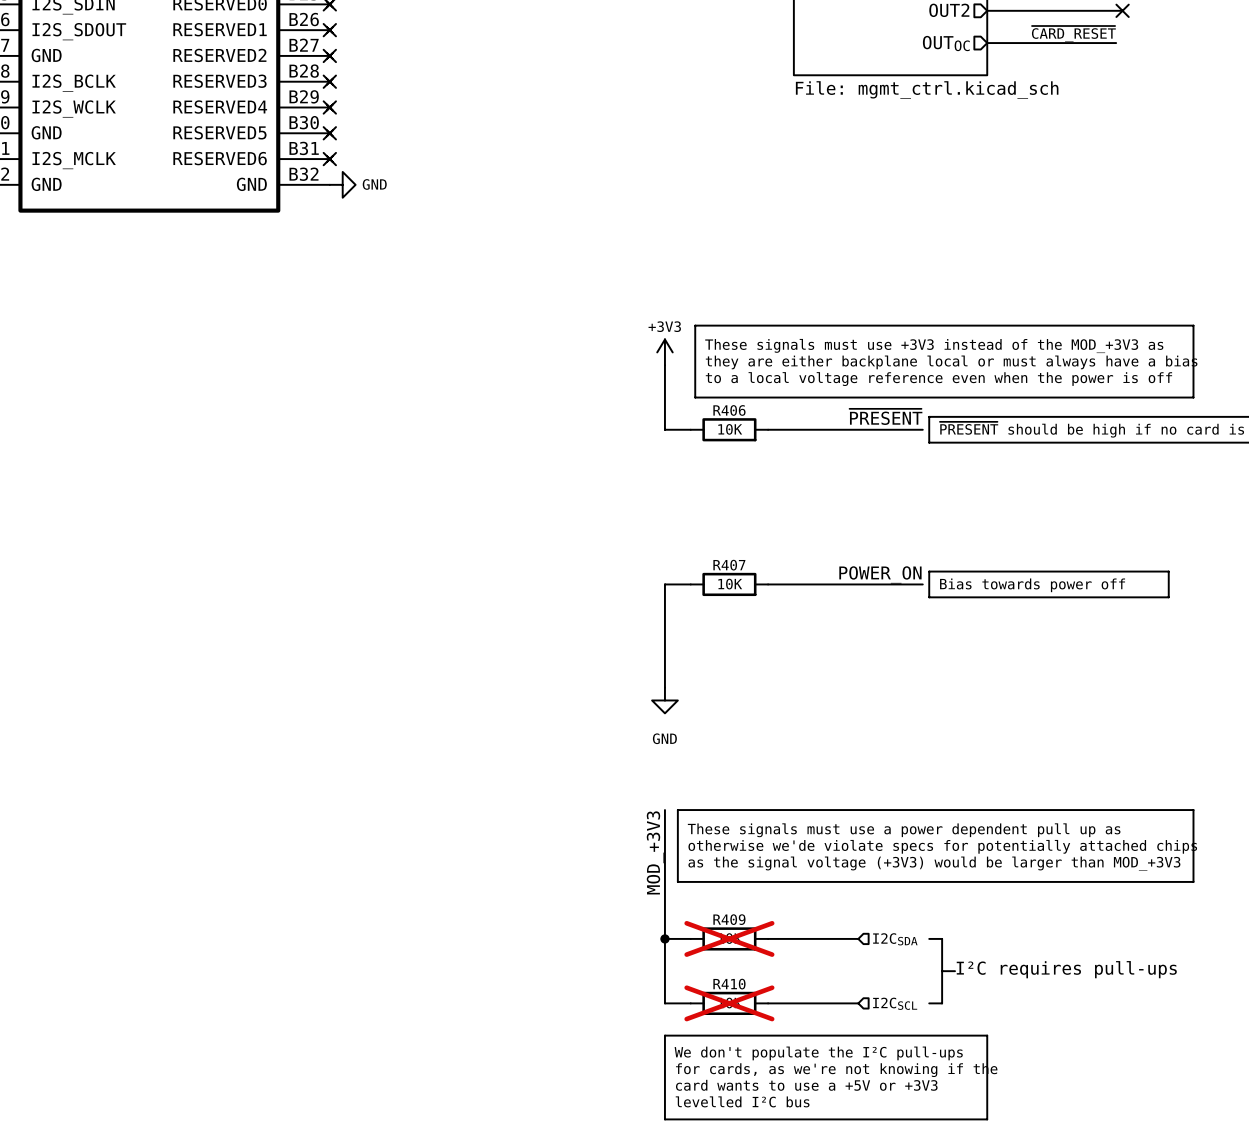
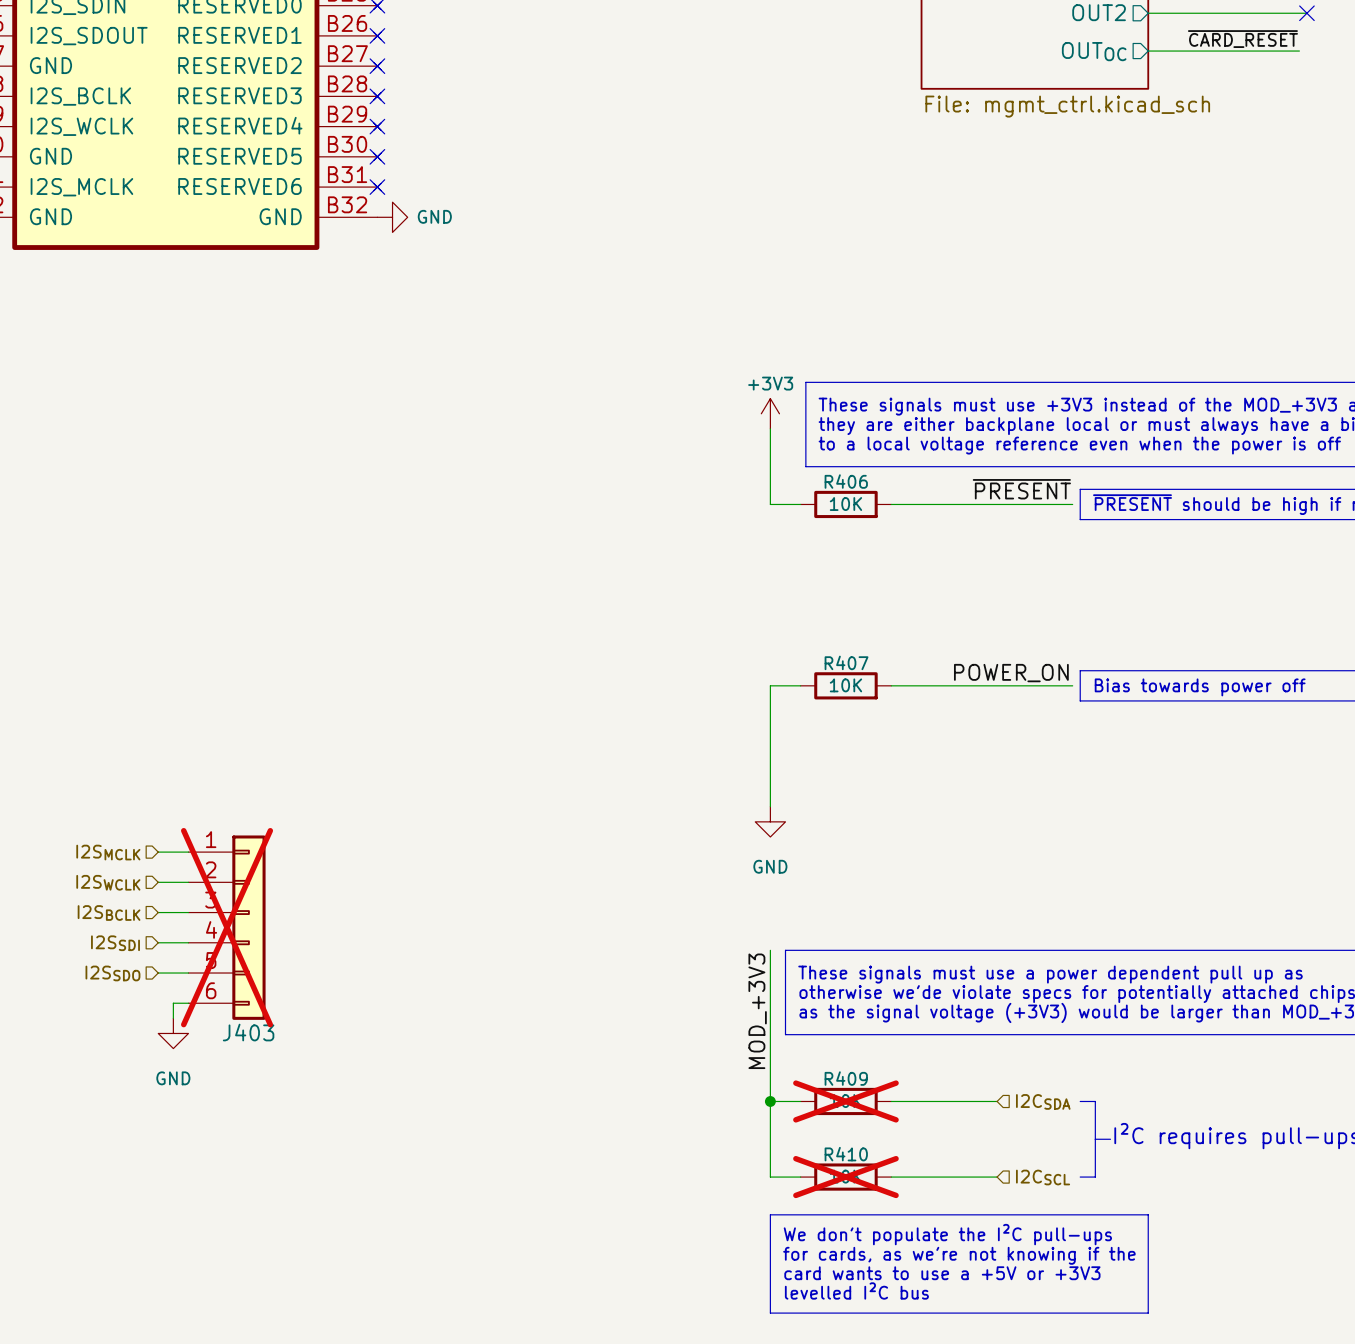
hierarchical label: none -> I2SMCLK (108, 852)
wire: none -> (158, 852) (188, 852)
hierarchical label: none -> I2SWCLK (108, 882)
wire: none -> (158, 882) (188, 882)
wire: none -> (158, 912) (188, 912)
hierarchical label: none -> I2SBCLK (109, 913)
J403: none -> (227, 927)
hierarchical label: none -> I2SSDI (115, 943)
wire: none -> (158, 942) (188, 942)
hierarchical label: none -> I2SSDO (112, 973)
wire: none -> (158, 973) (188, 973)
wire: none -> (188, 1003) (173, 1003) (173, 1018)
power symbol: none -> GND (173, 1033)

